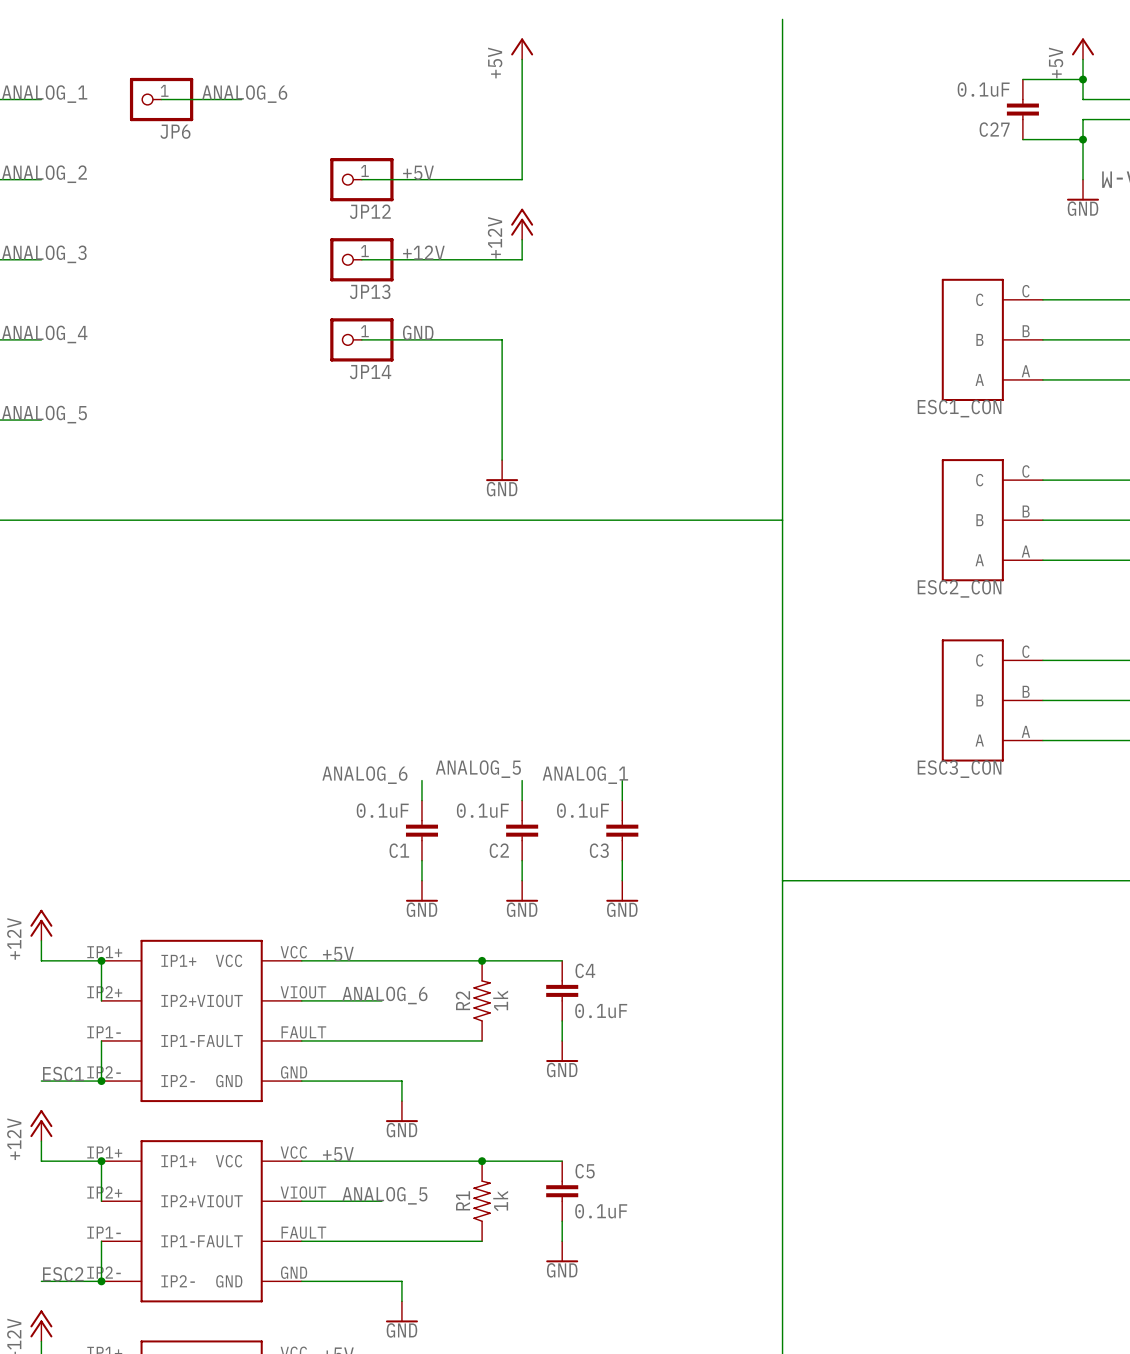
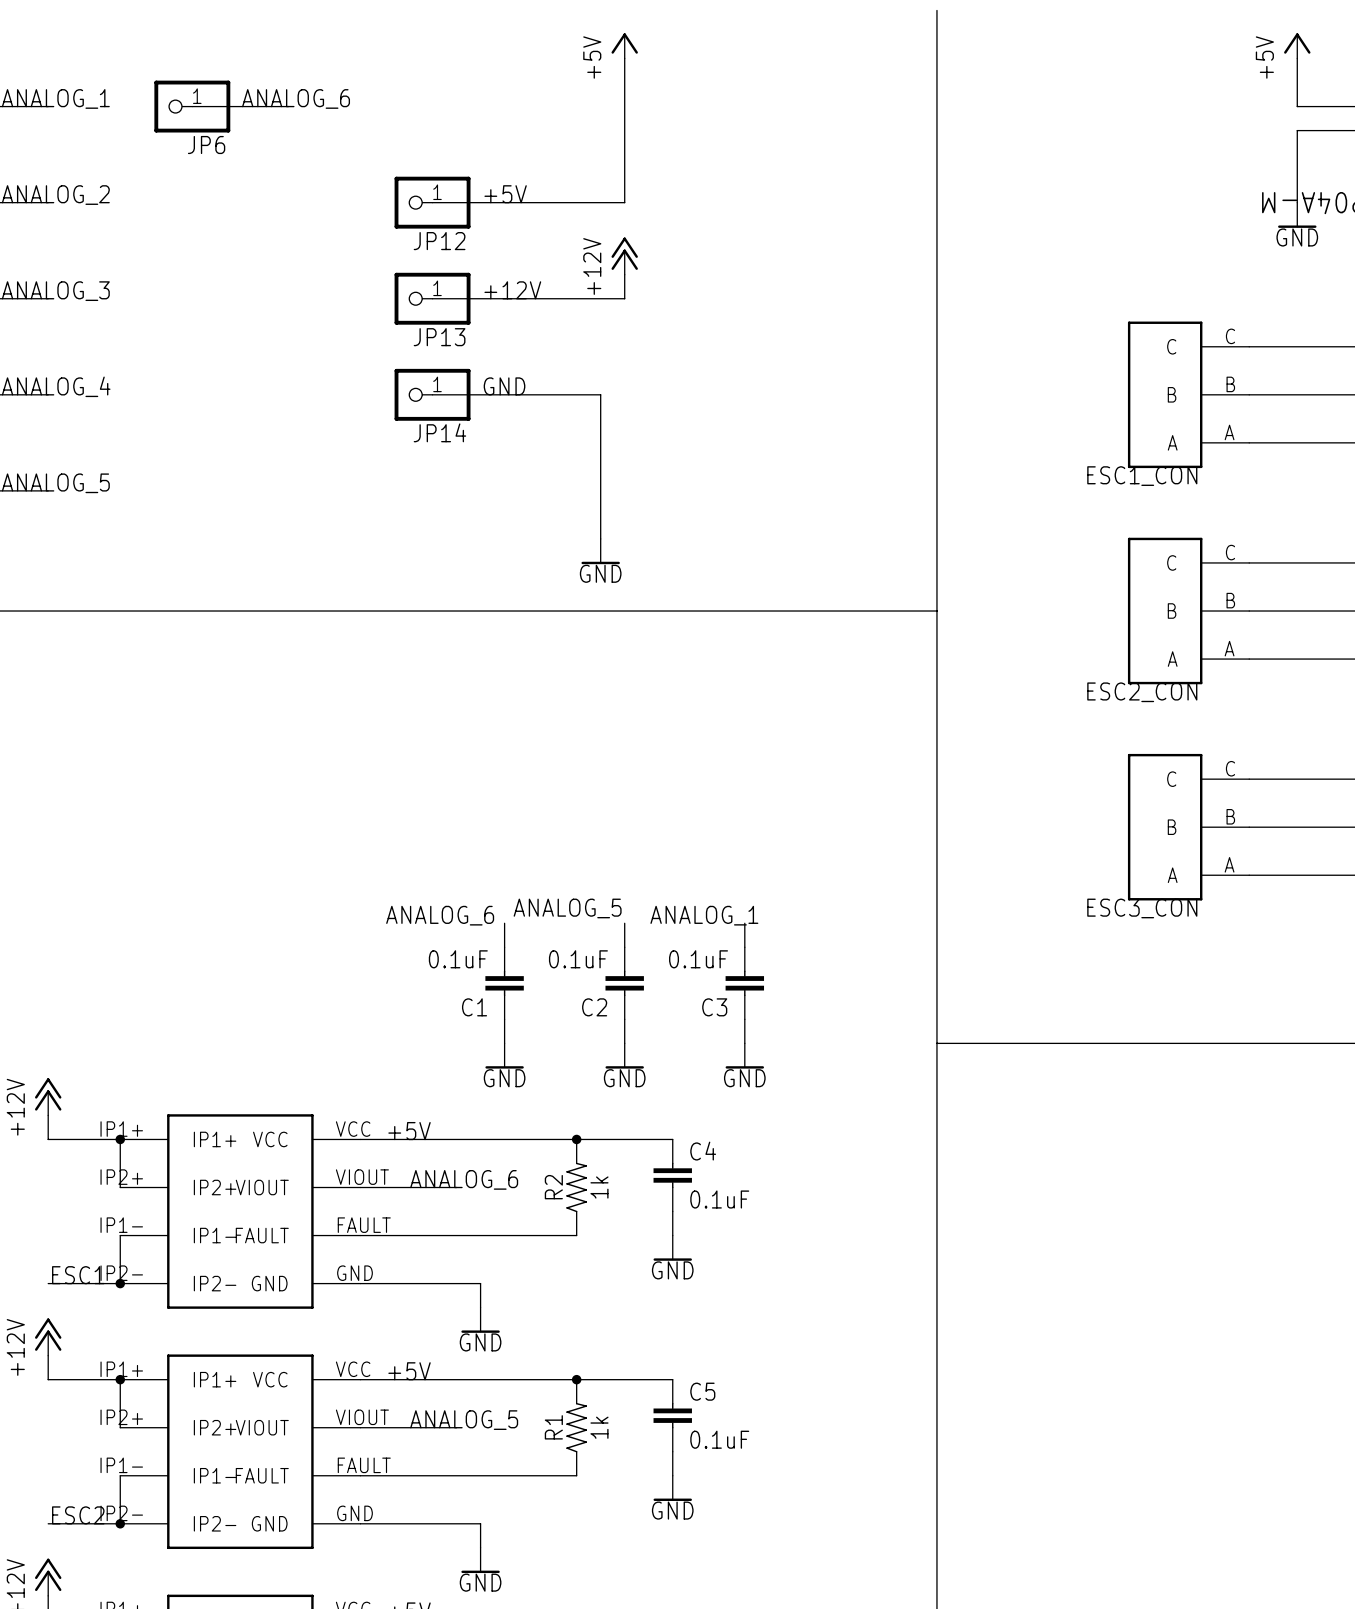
wire: (1022, 79) (1083, 79) -> none
junction: (1083, 79) -> none
C27: 0.1uF (1022, 109) -> none
wire: (1022, 139) (1083, 139) -> none
junction: (1083, 139) -> none

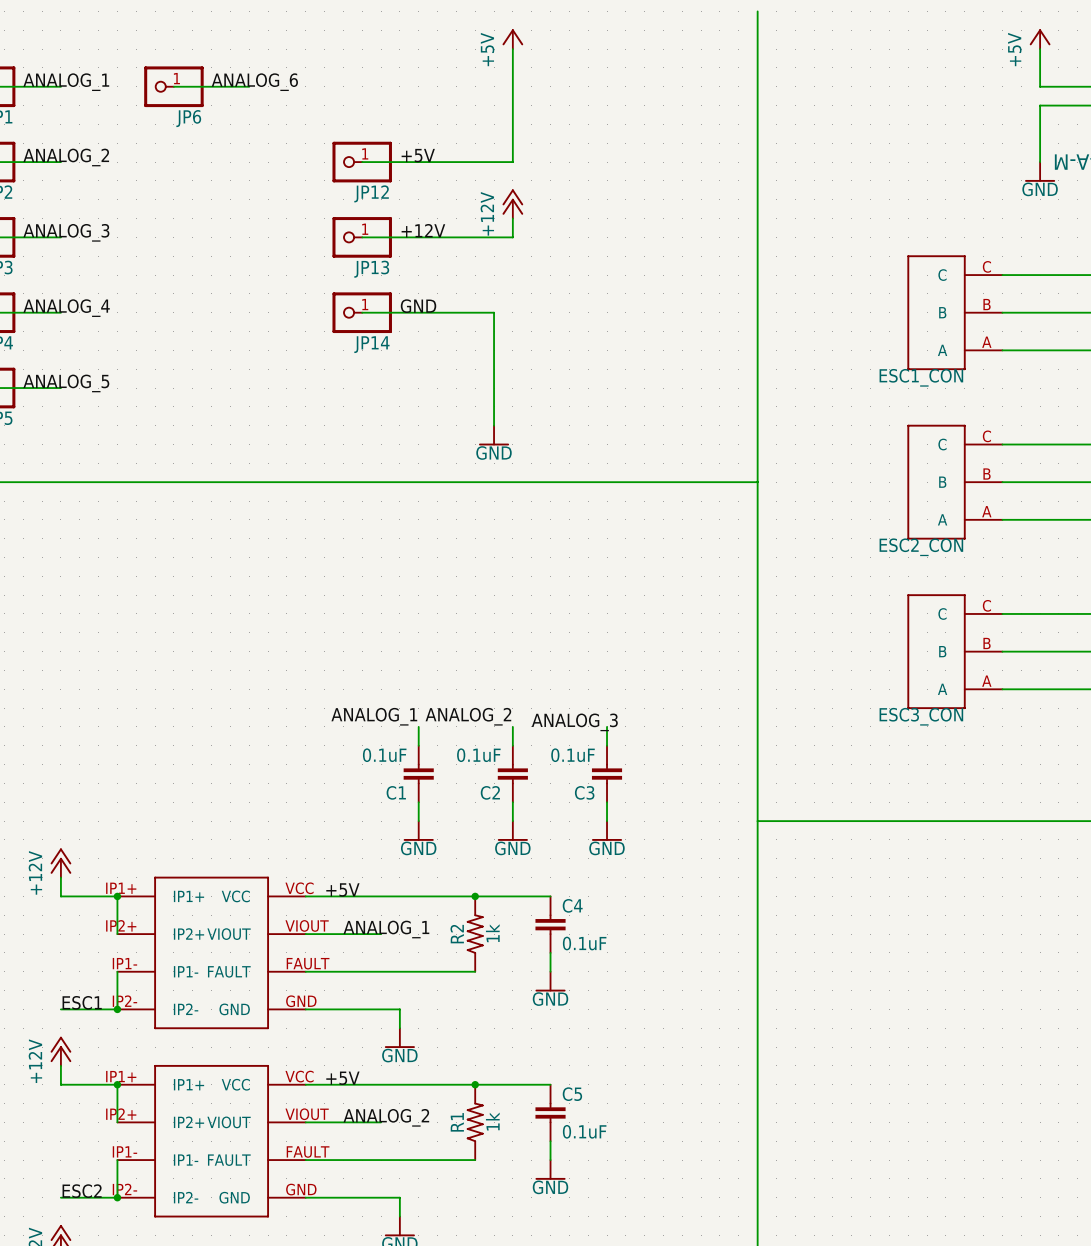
label: ANALOG_5 (567, 908) -> ANALOG_2 (468, 716)
label: ANALOG_6 (440, 915) -> ANALOG_1 (374, 716)
label: ANALOG_1 (704, 915) -> ANALOG_3 (574, 722)
label: ANALOG_6 (464, 1179) -> ANALOG_1 (386, 929)
label: ANALOG_5 (464, 1420) -> ANALOG_2 (386, 1117)

